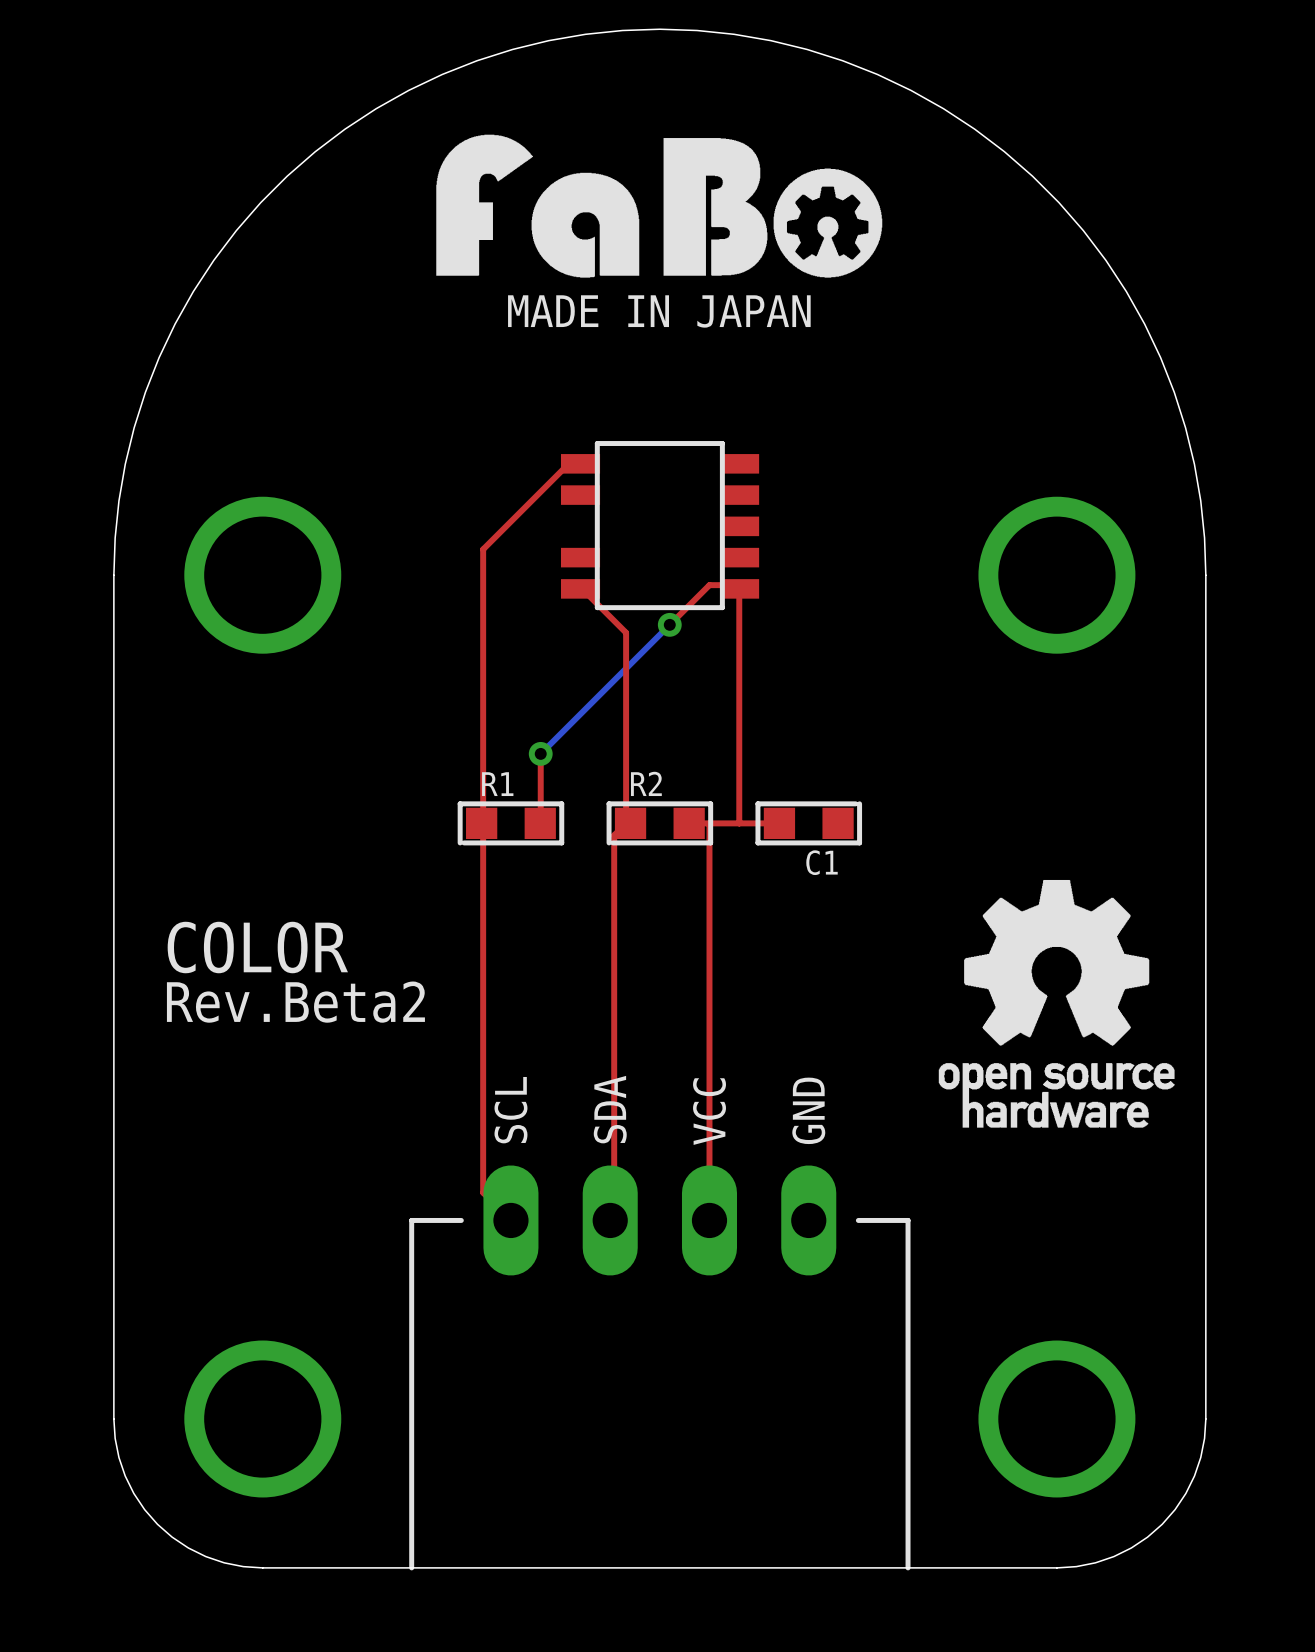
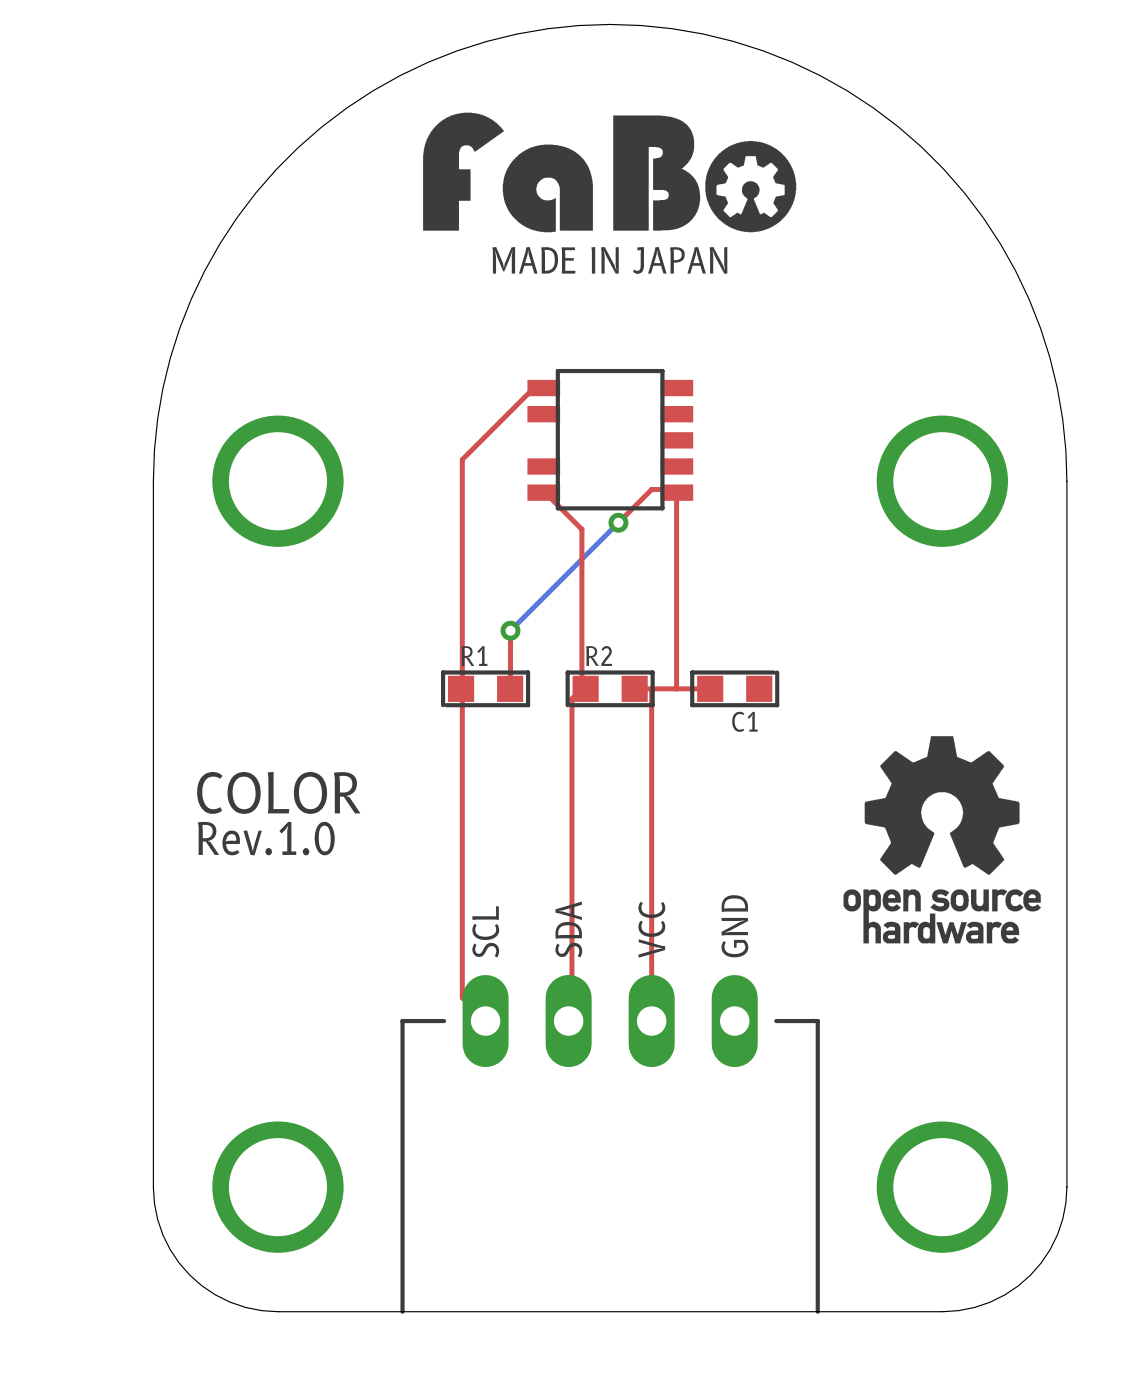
text: Rev.Beta2 (295, 1002) -> Rev.1.0 (266, 838)

